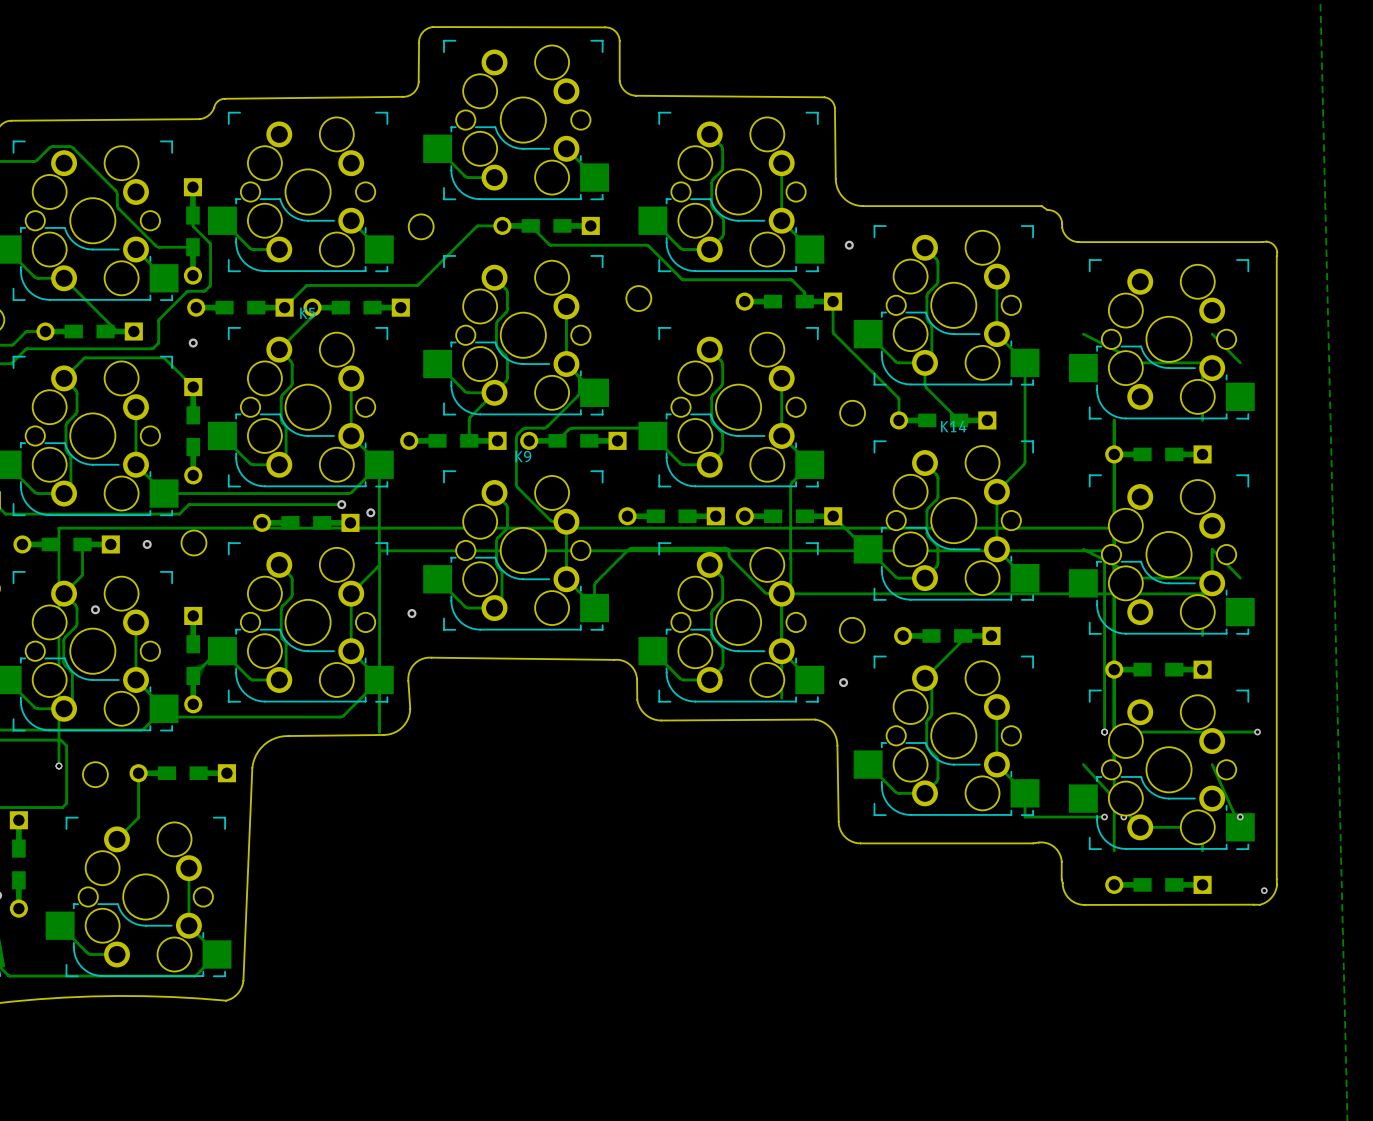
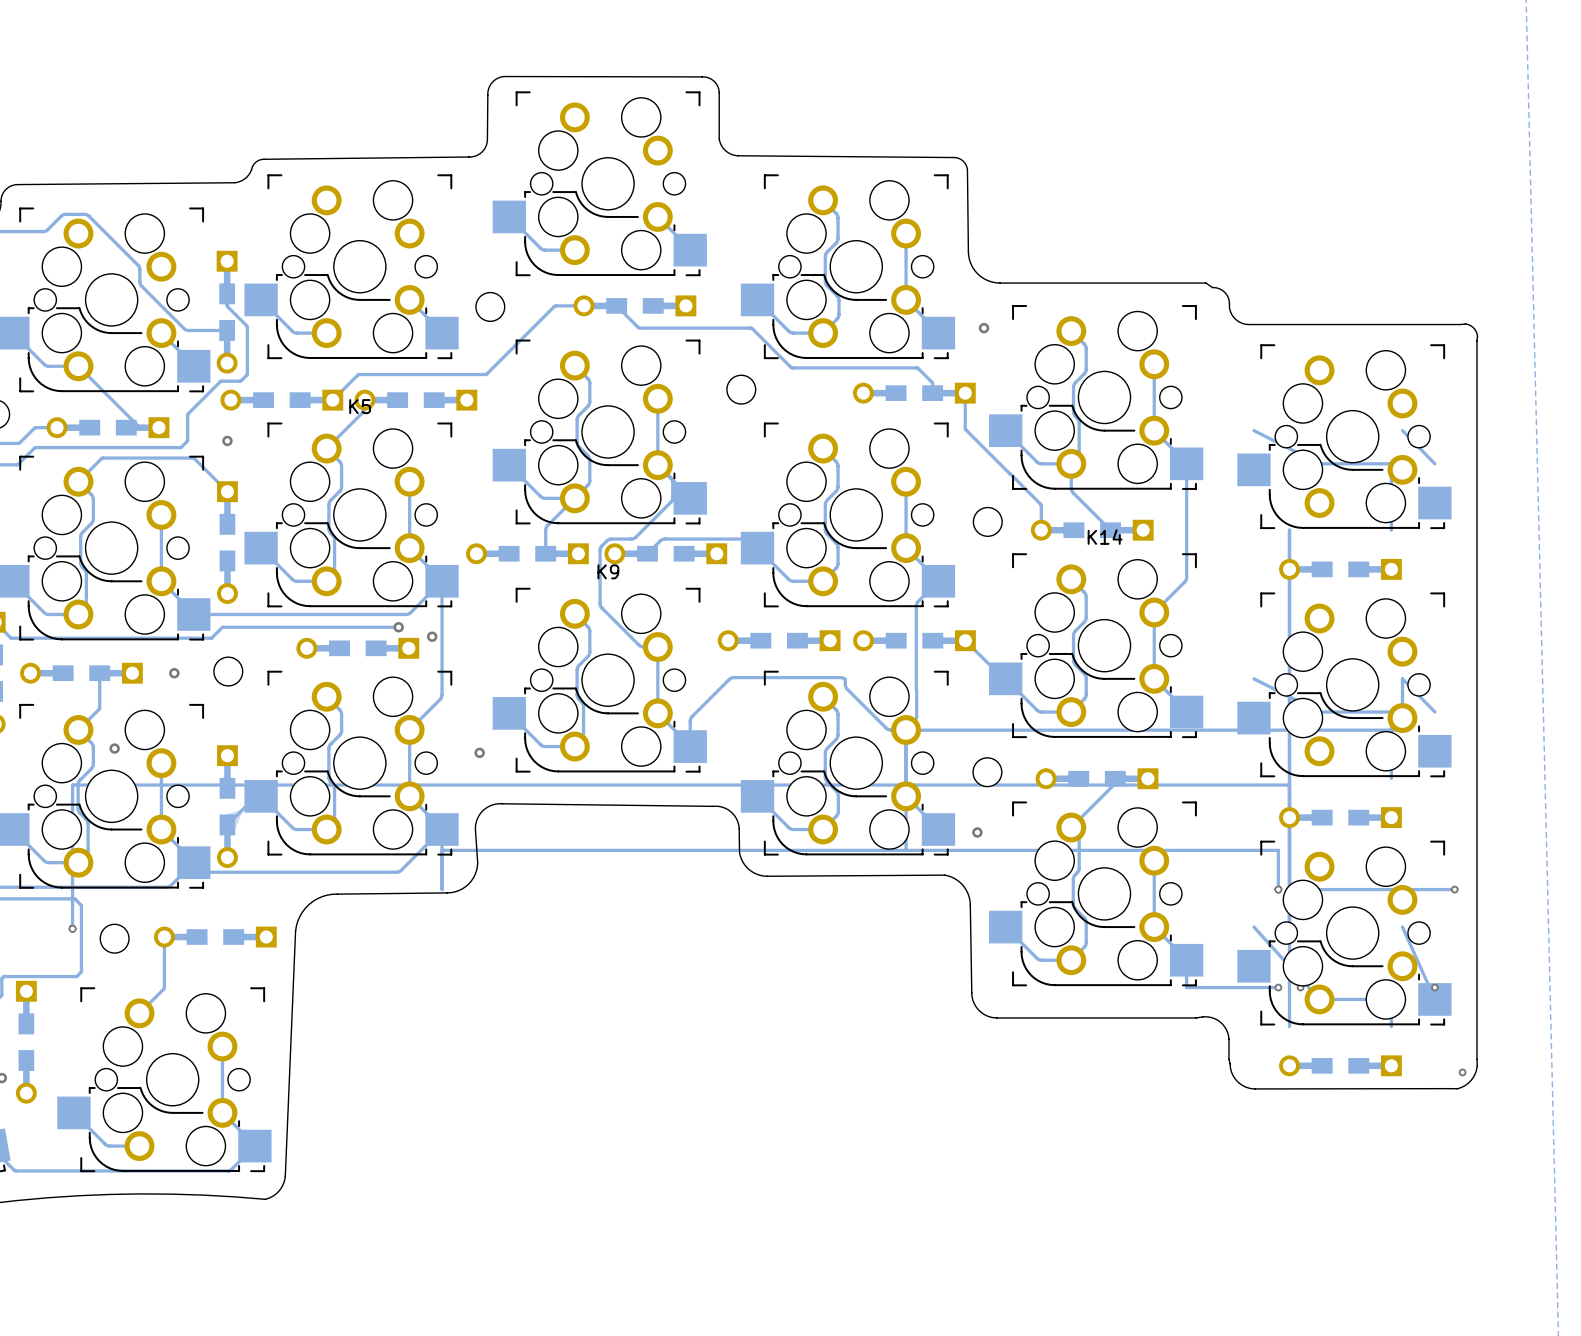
track: (1114, 528) (58, 528) (58, 641) -> (1289, 785) (72, 785)
track: (1104, 698) (1104, 550) (379, 550) (379, 698) -> (1278, 850) (442, 850)

